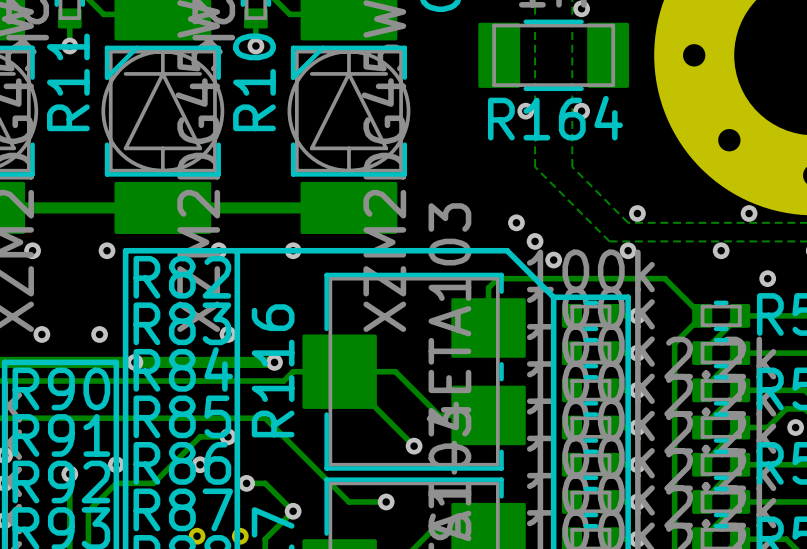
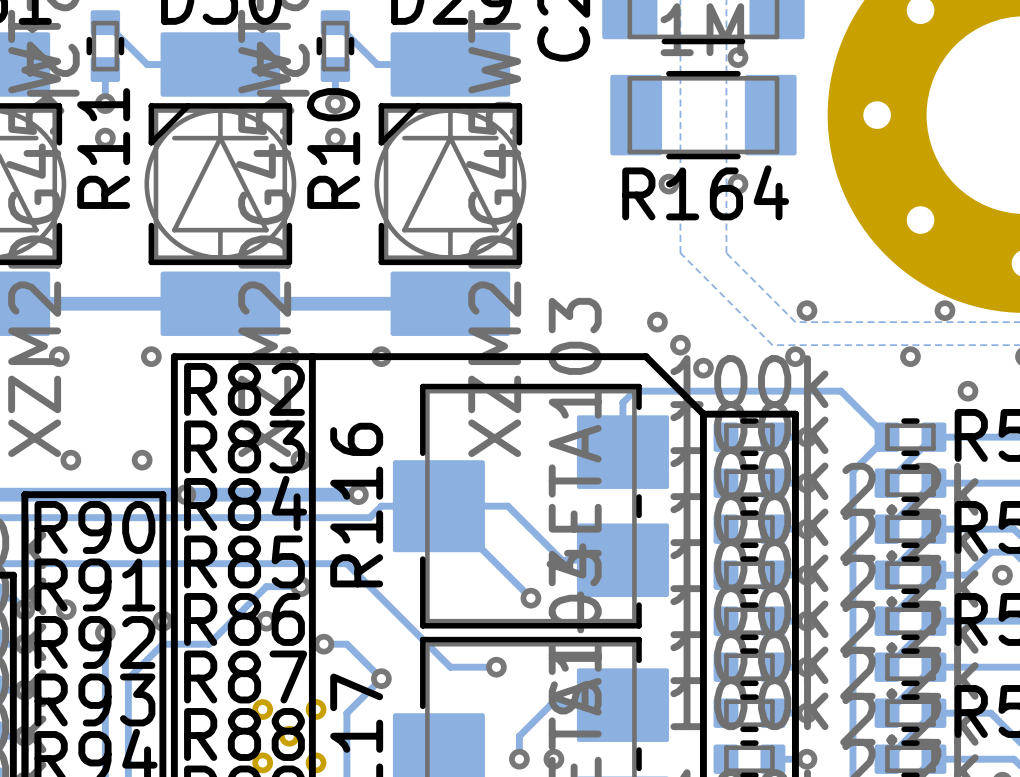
via: none -> (105, 138)
via: none -> (335, 138)
via: none -> (66, 609)

